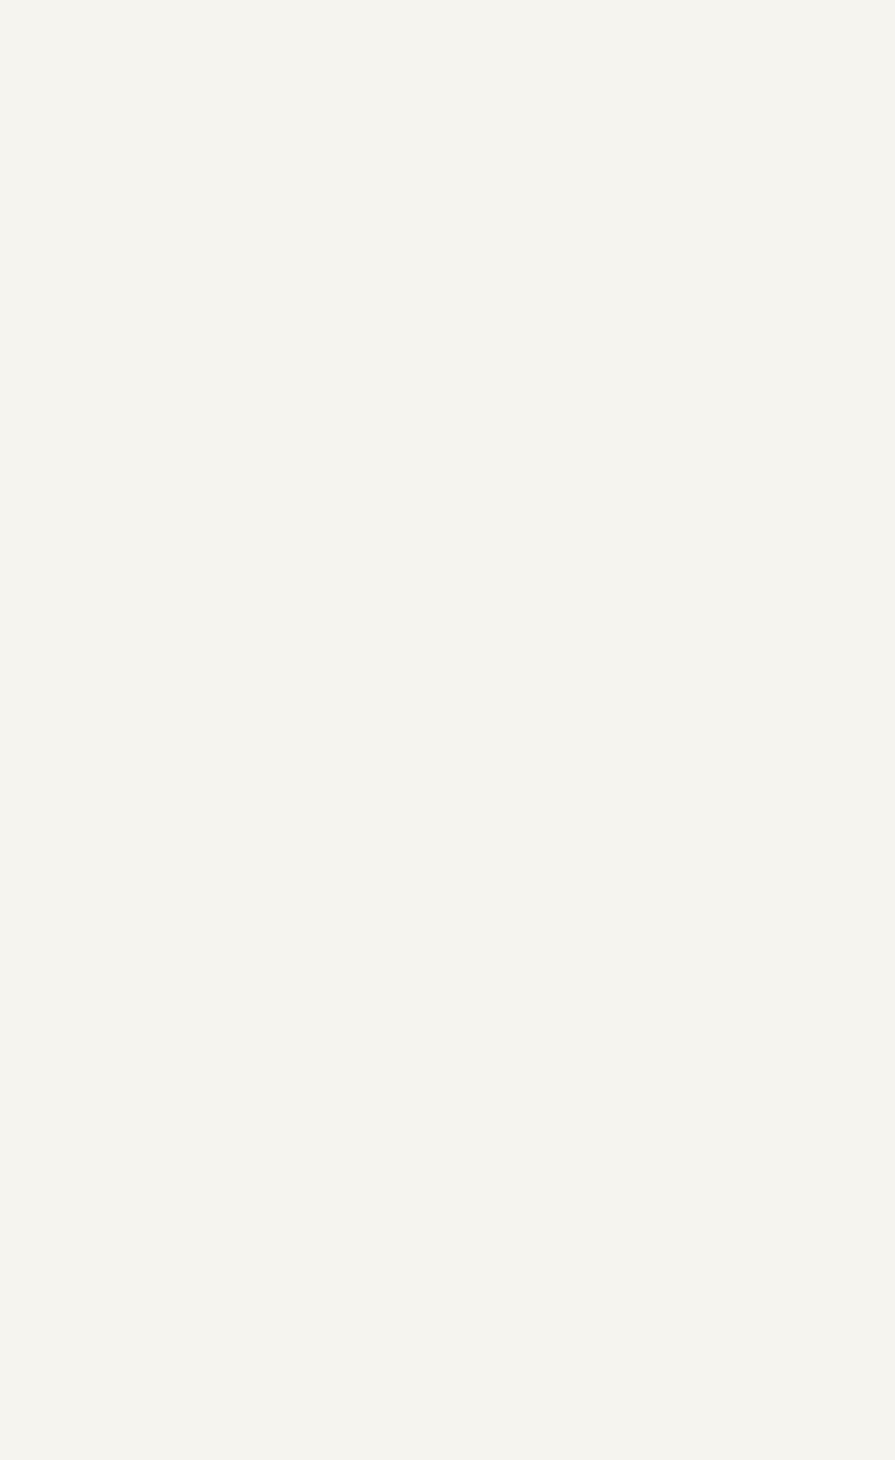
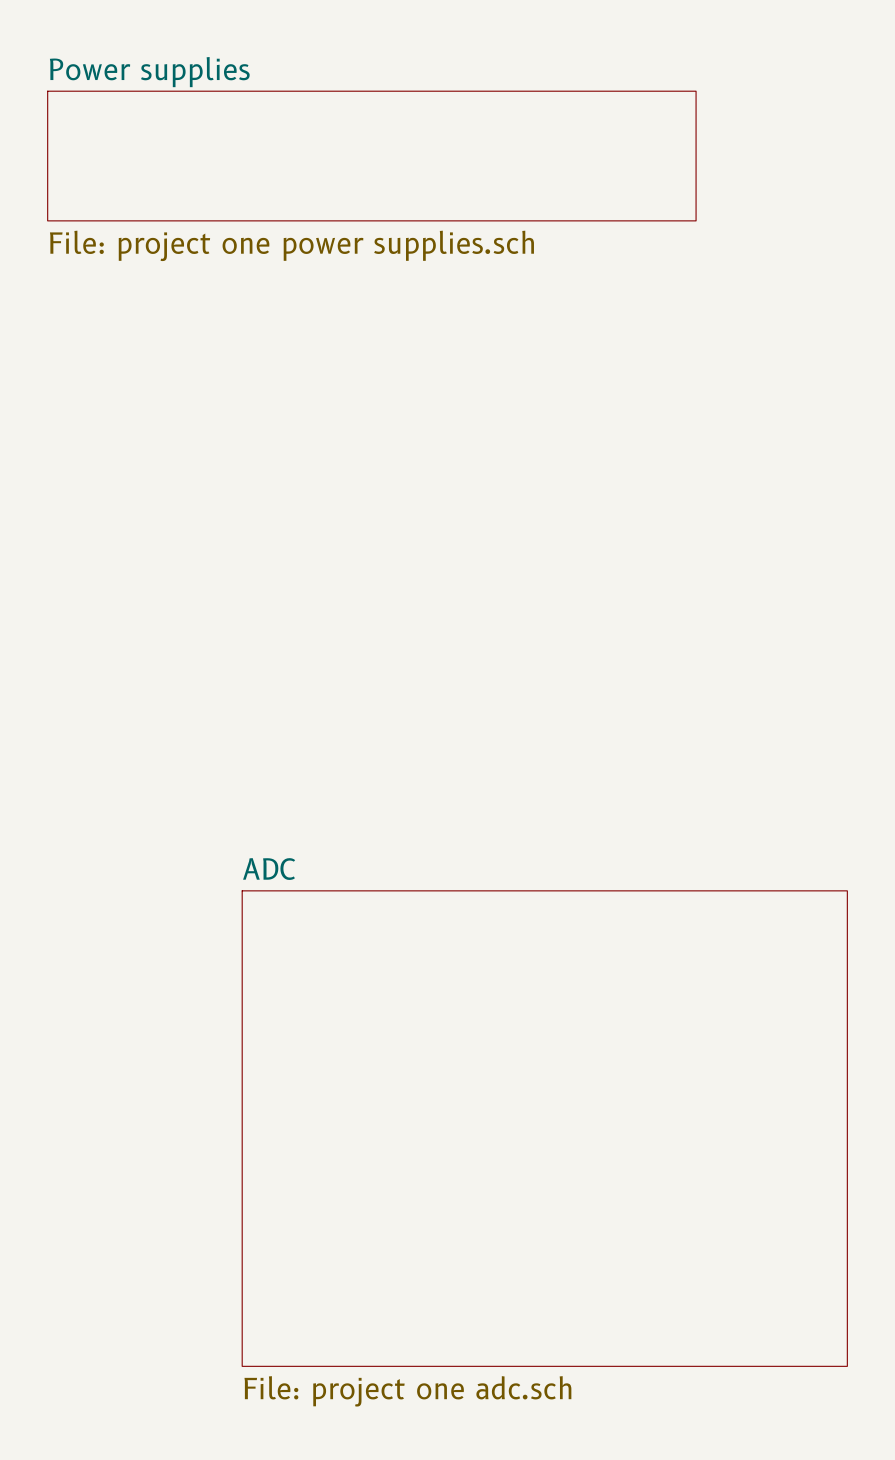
sheet Power supplies: none -> File: project one power supplies.sch (371, 156)
sheet ADC: none -> File: project one adc.sch (544, 1128)

